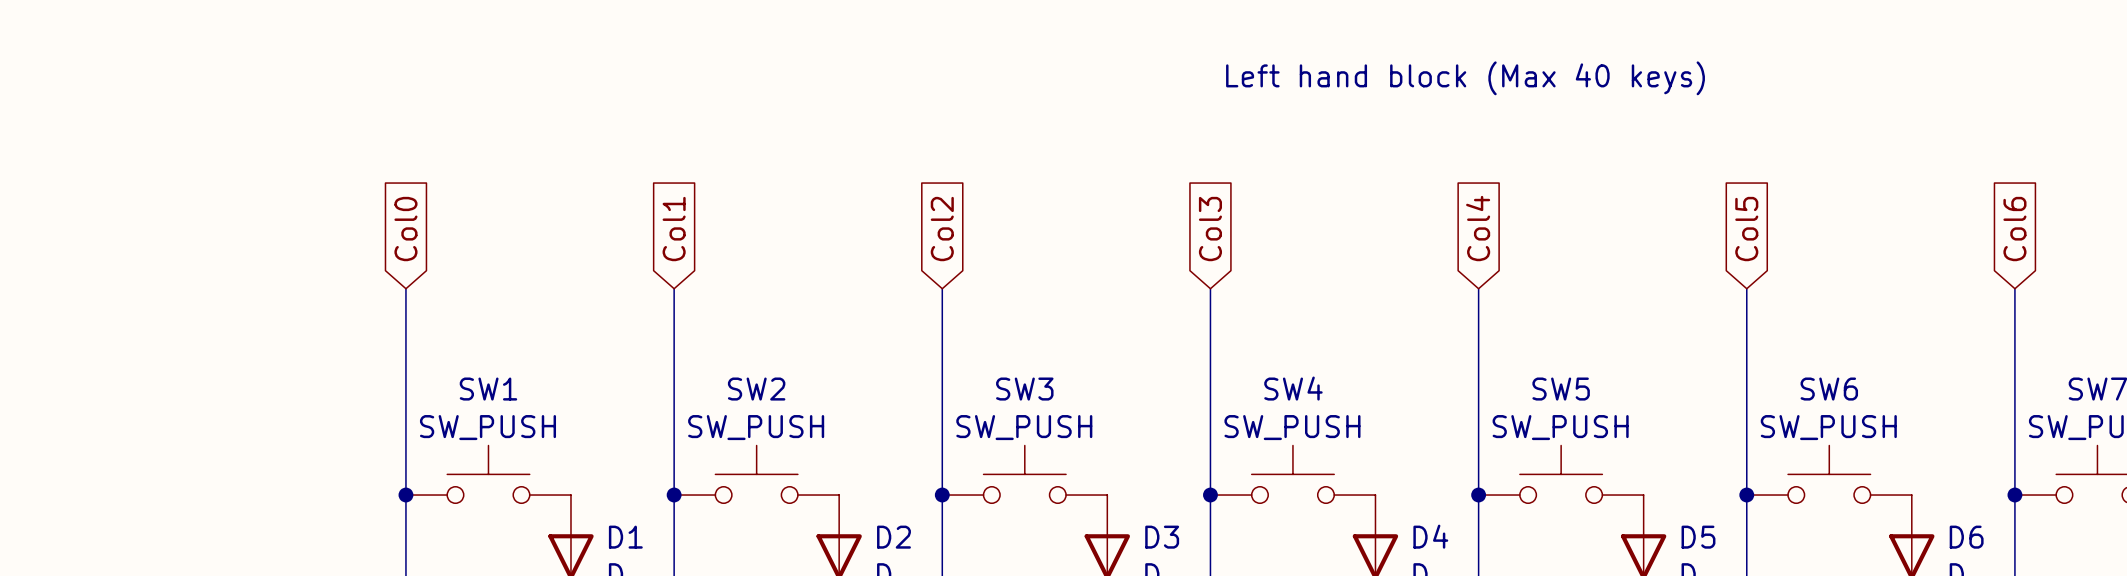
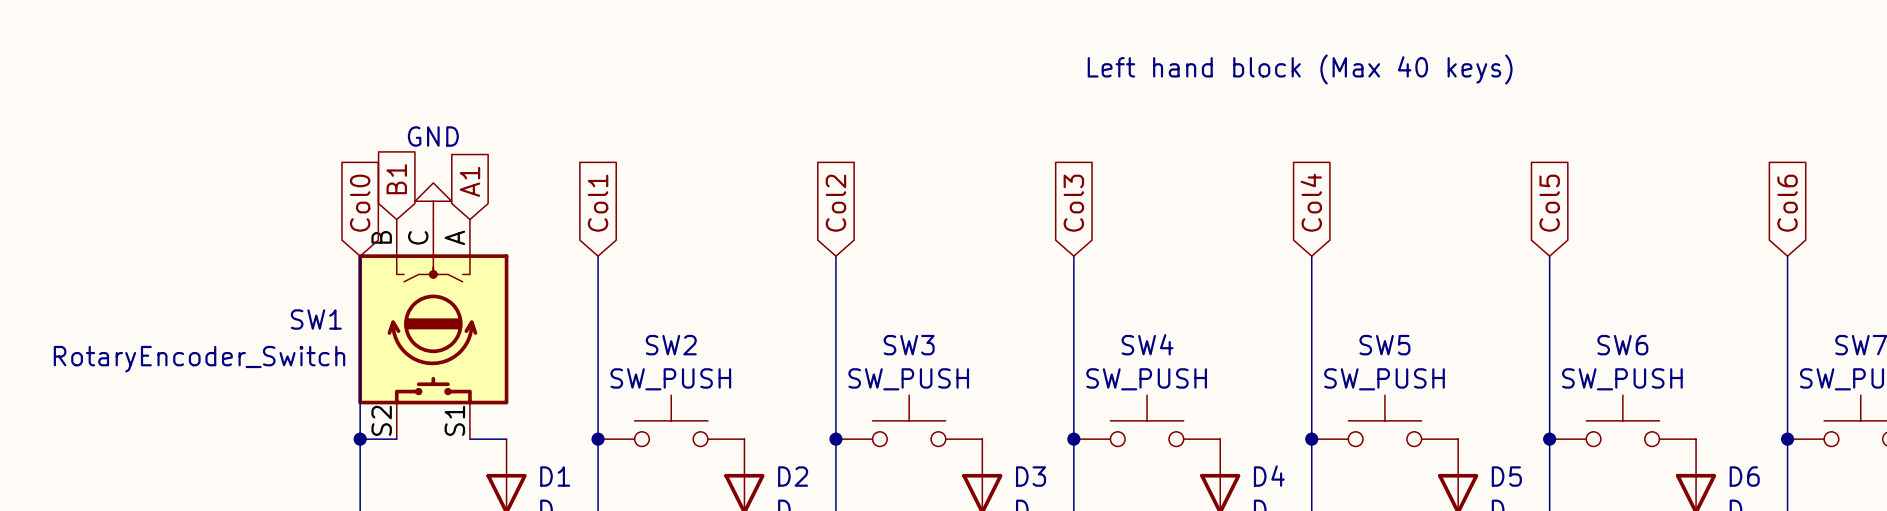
global label: none -> B1 (396, 179)
global label: none -> A1 (469, 181)
power symbol: none -> GND (433, 201)
SW1 name position: SW1 (488, 389) -> SW1 (316, 319)
SW1 value: SW_PUSH (487, 427) -> RotaryEncoder_Switch (199, 359)
SW1 symbol: [405, 445, 571, 504] -> [358, 219, 509, 440]

